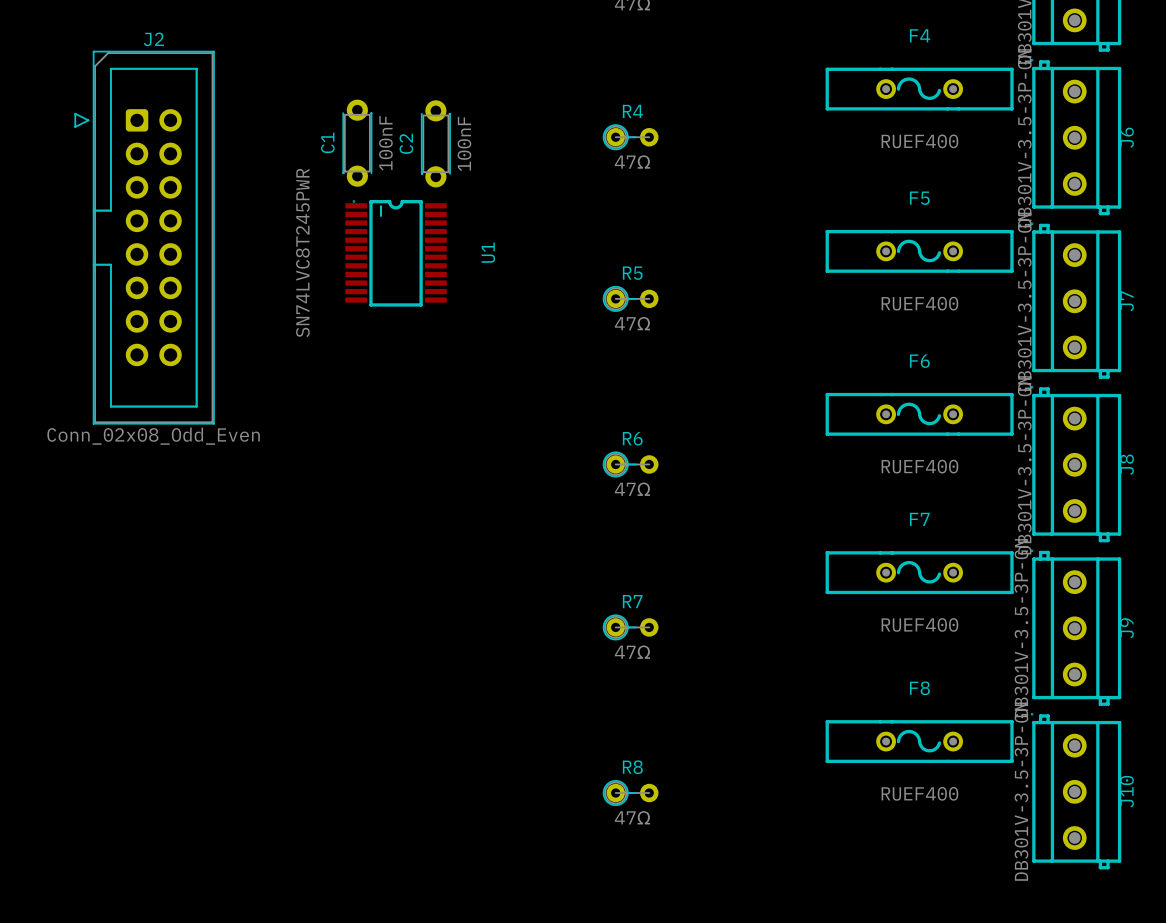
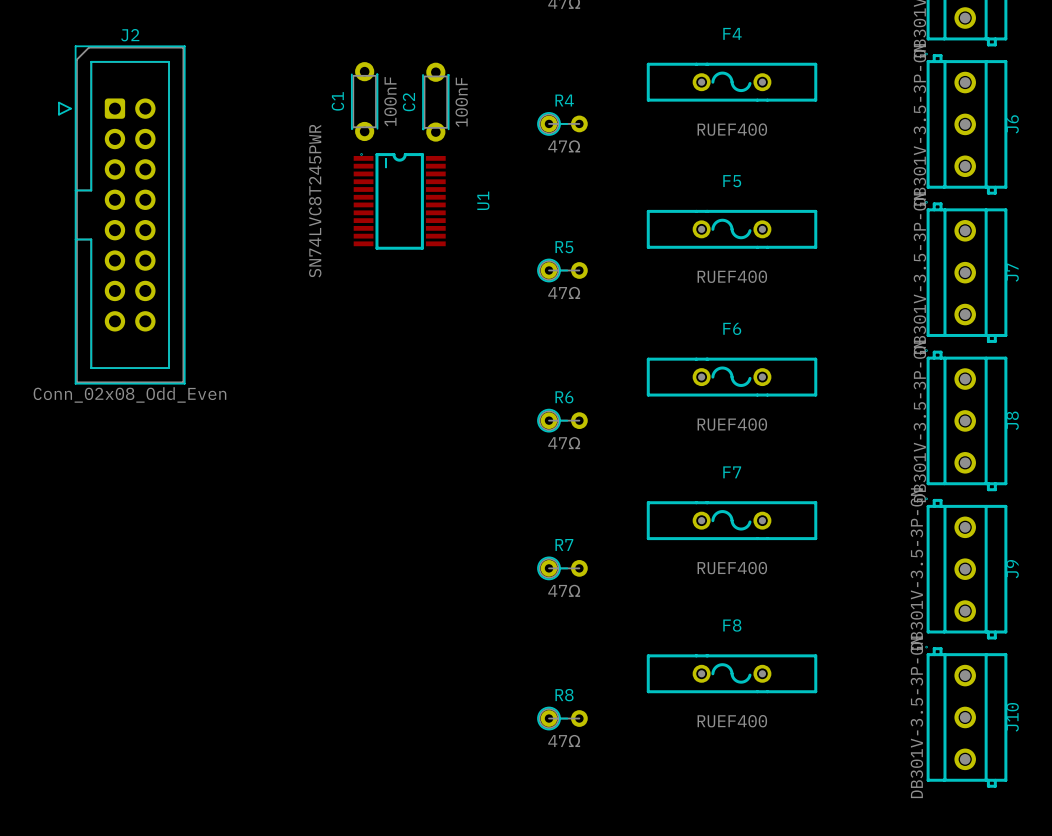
F4 position: (919, 89) -> (732, 82)
C1 position: (357, 143) -> (364, 101)
C2 position: (435, 143) -> (435, 102)
F5 position: (919, 251) -> (732, 229)
U1 position: (396, 253) -> (399, 201)
F6 position: (919, 414) -> (732, 377)
F7 position: (919, 572) -> (732, 520)
F8 position: (919, 741) -> (732, 673)

